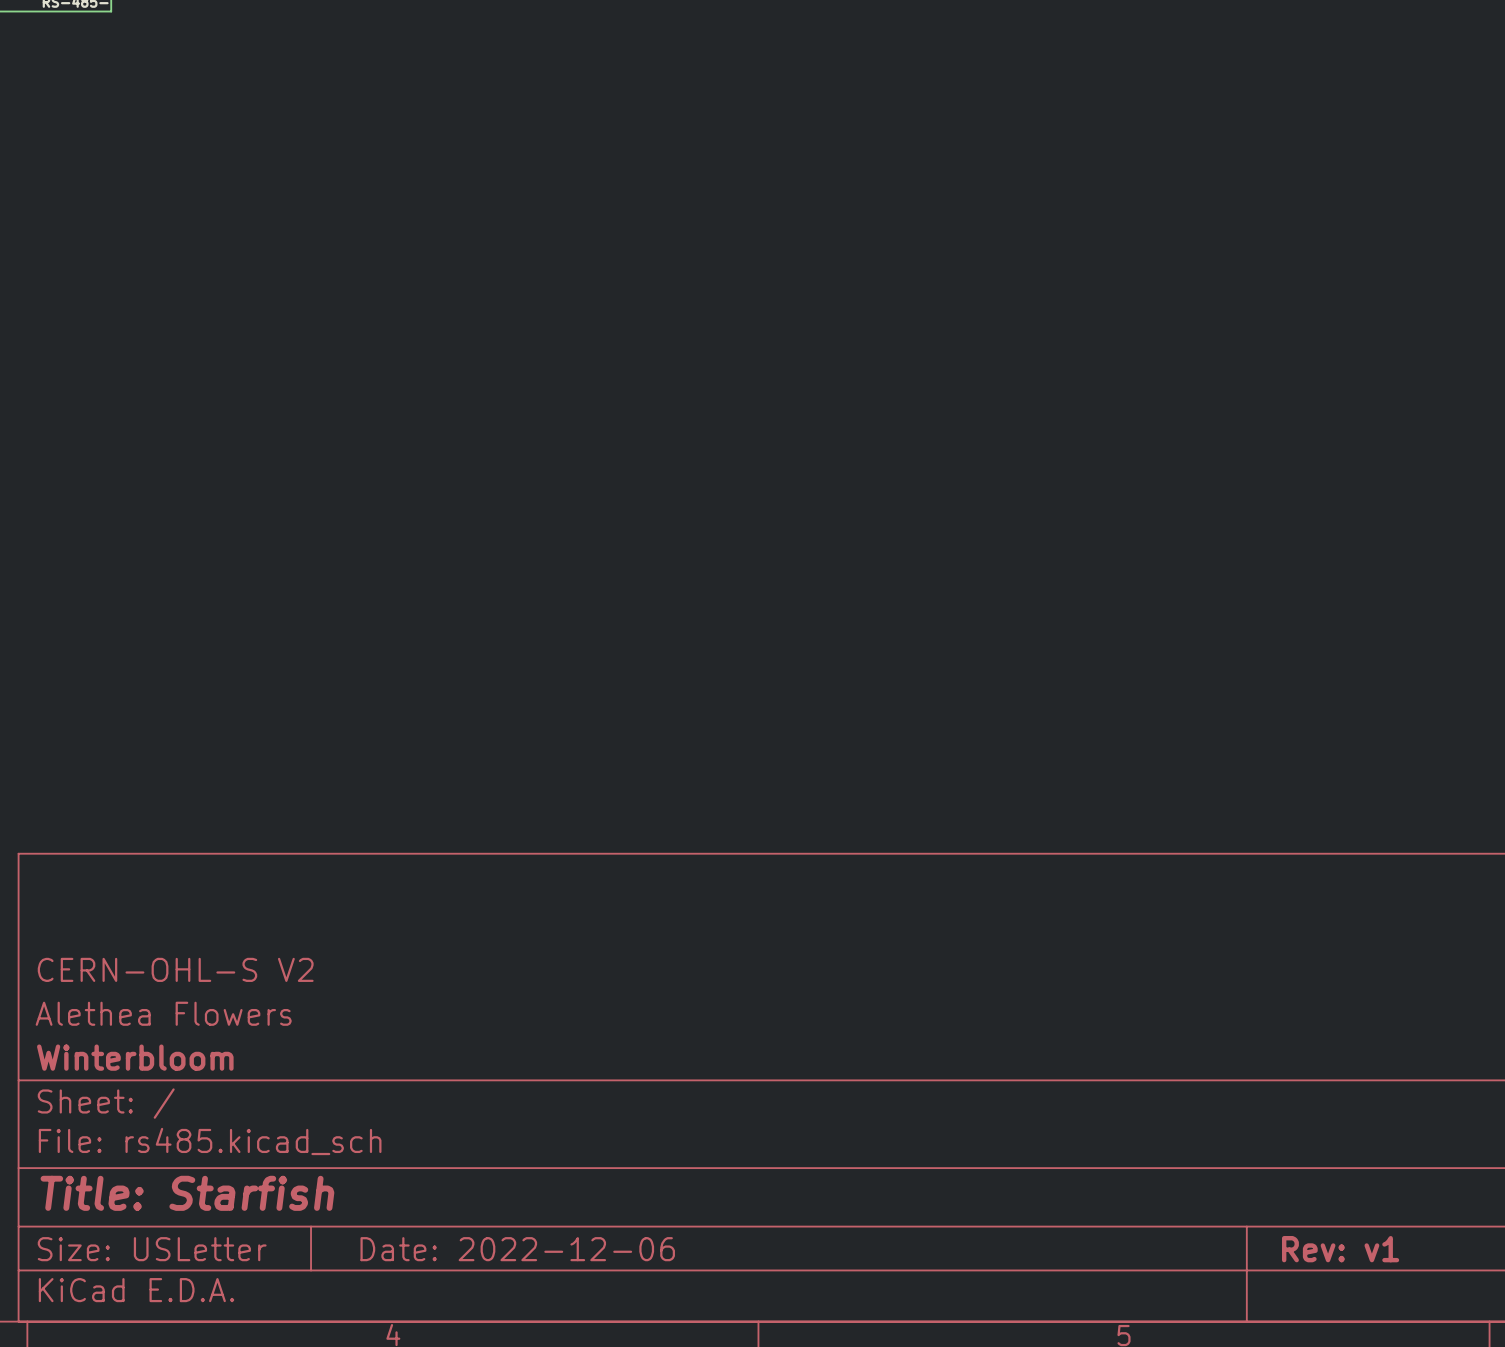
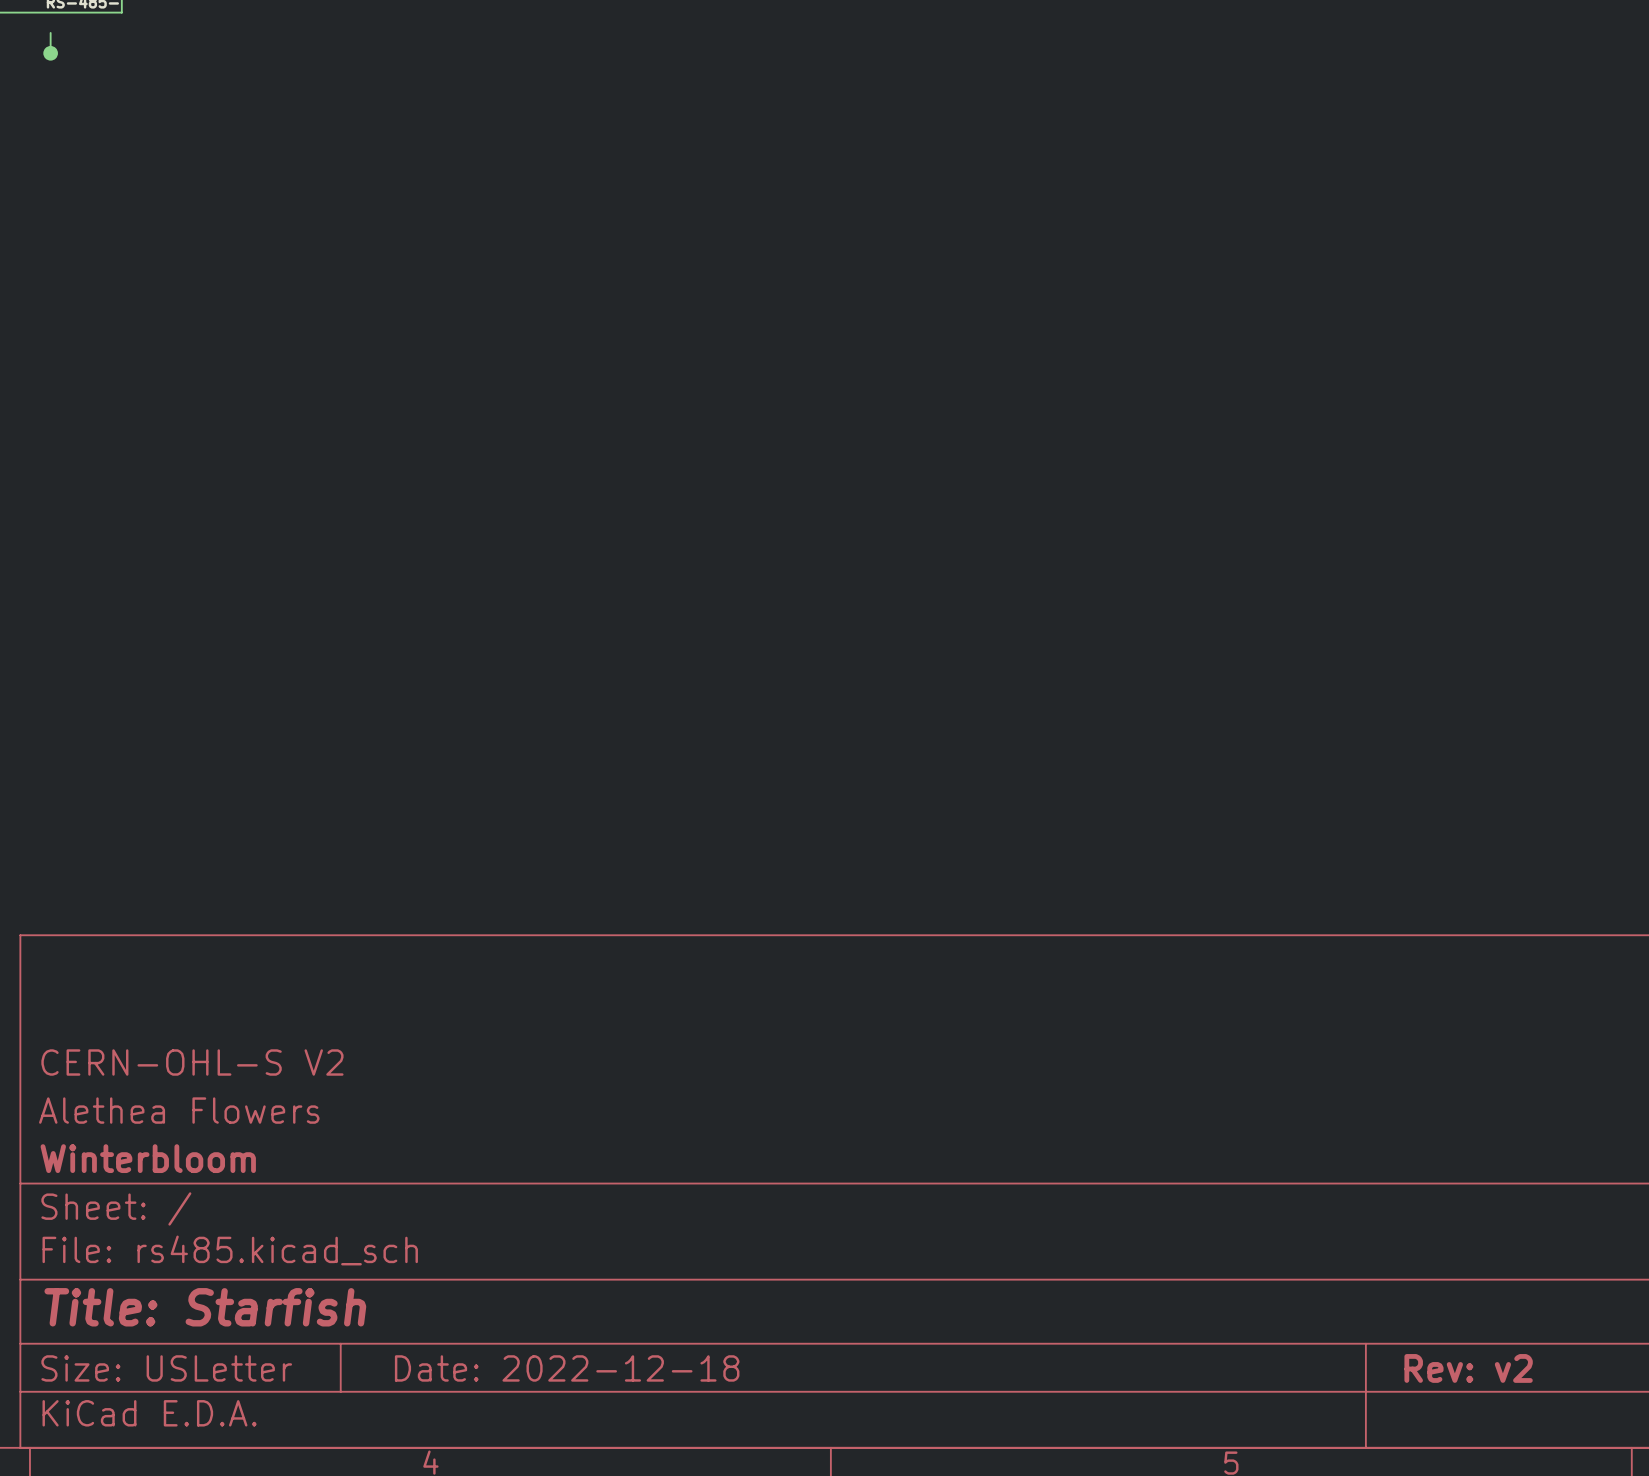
wire: none -> (50, 32) (50, 53)
junction: none -> (50, 53)
title block: Date: 2022-12-06 (517, 1249) -> Date: 2022-12-18 (567, 1368)
title block: Rev: v1 (1340, 1249) -> Rev: v2 (1468, 1368)

